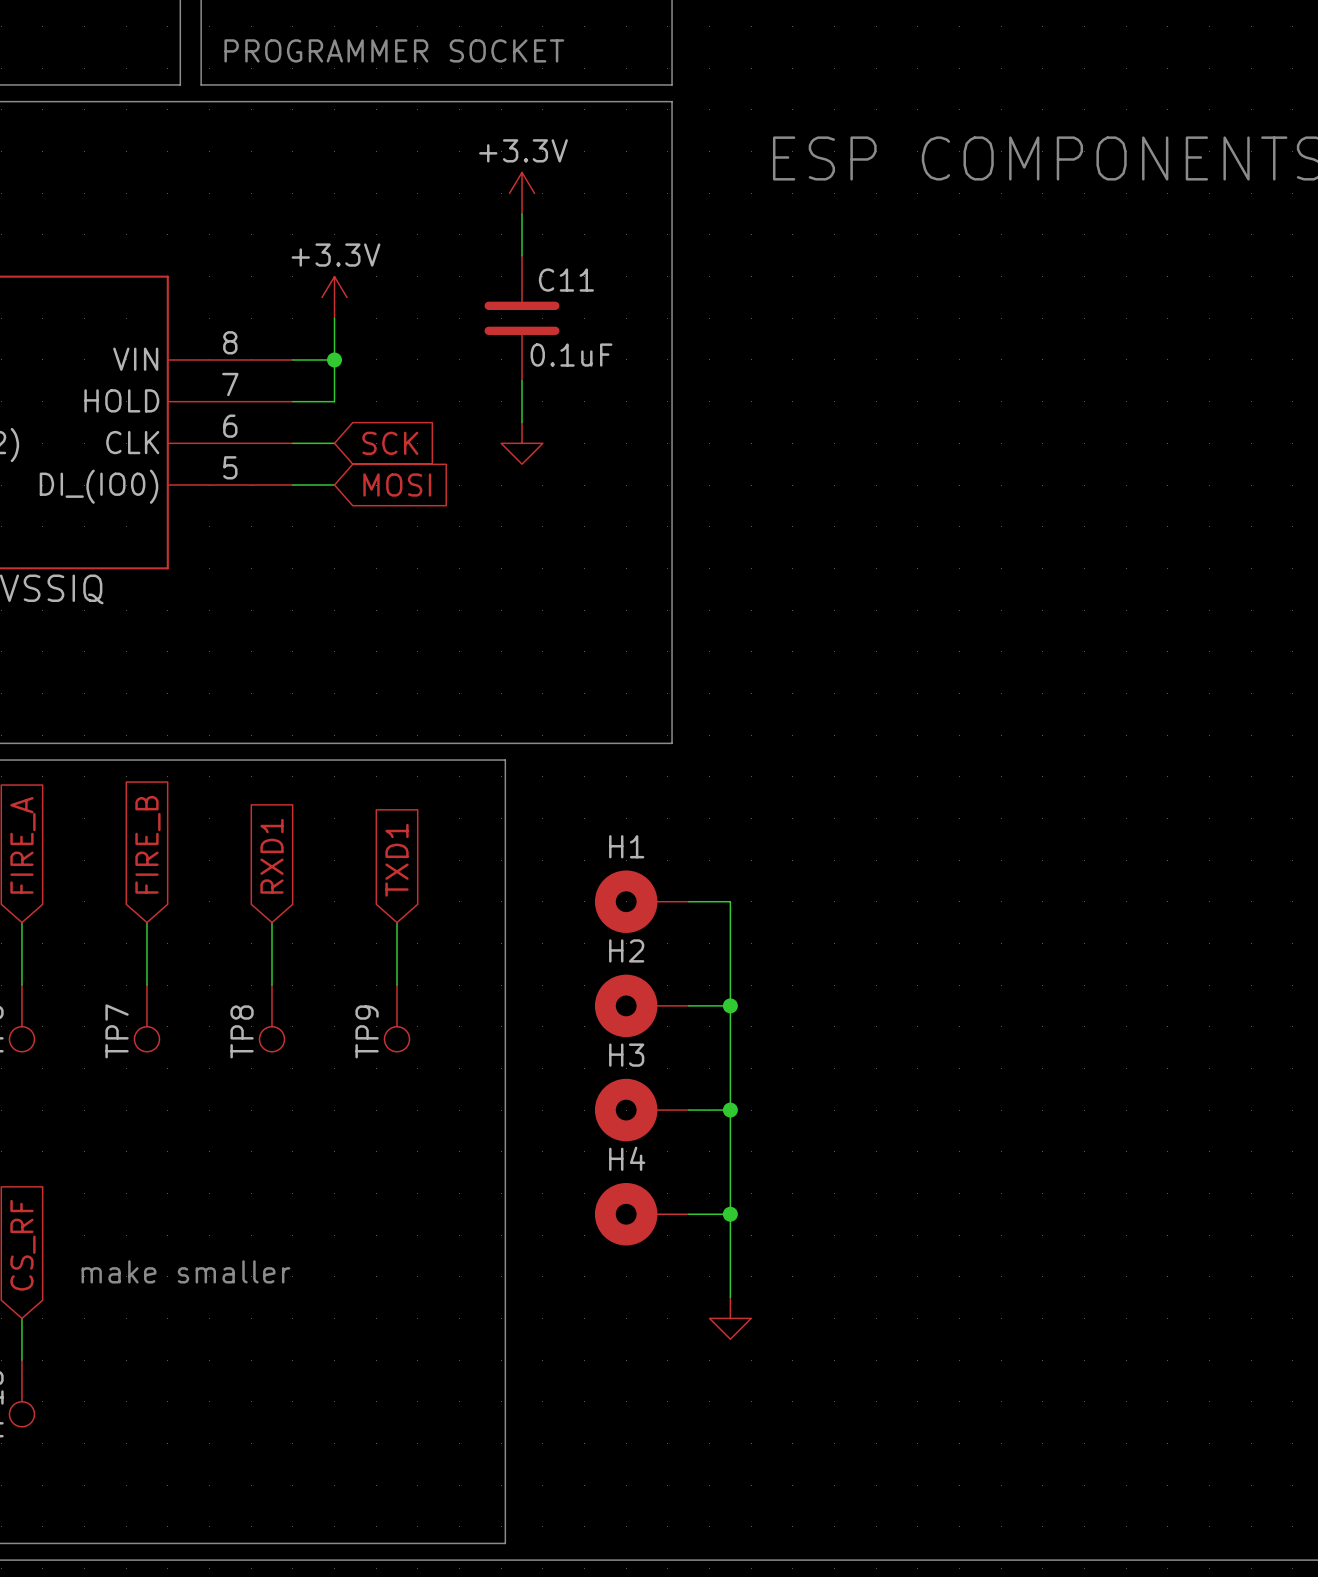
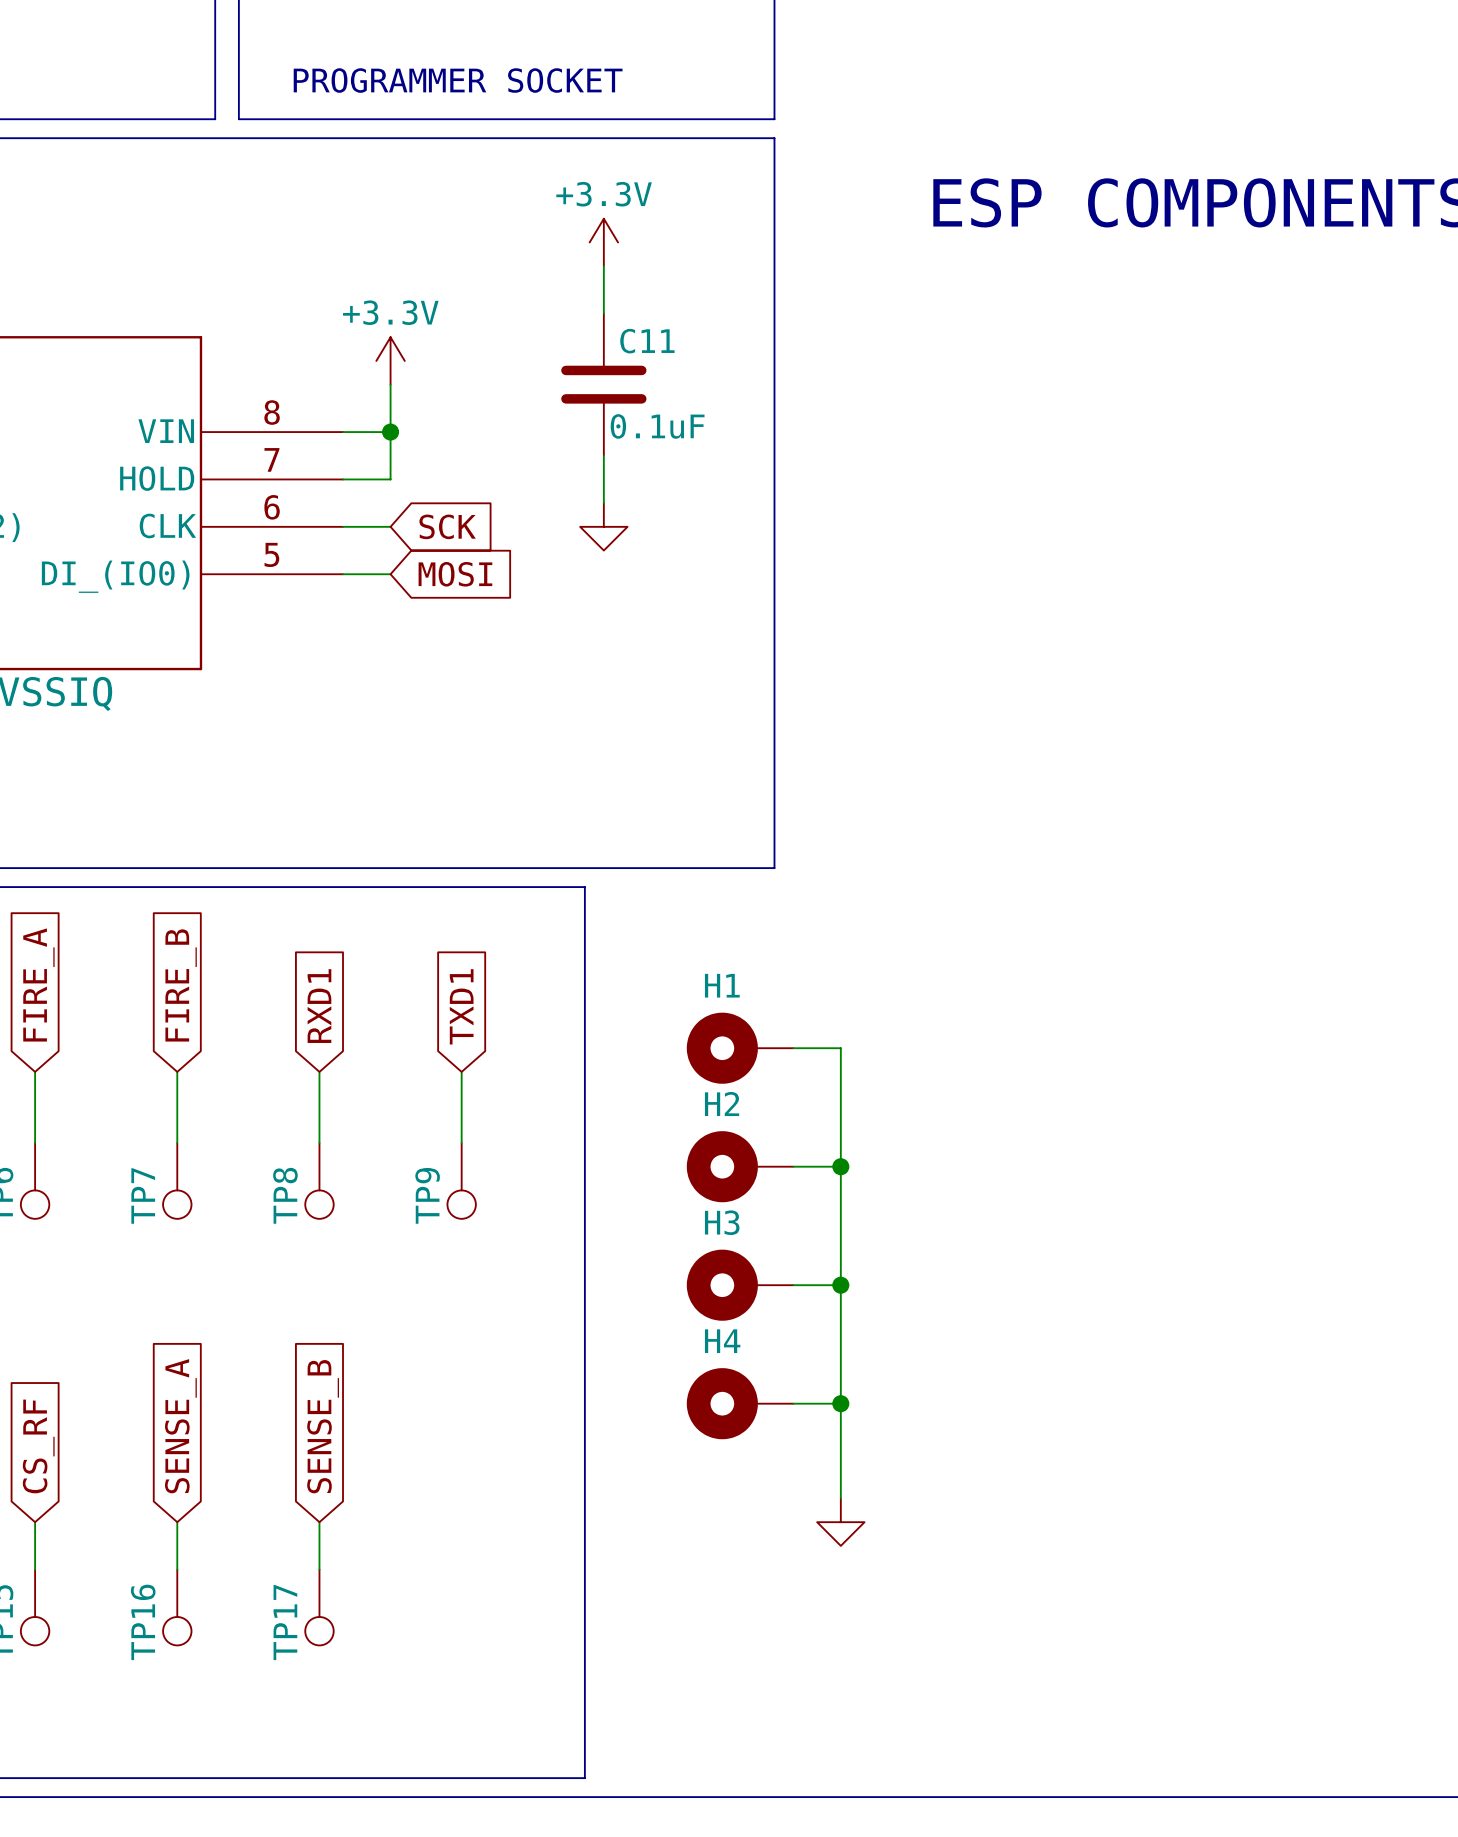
global label: none -> SENSE_A (180, 1426)
global label: none -> SENSE_B (323, 1426)
text: make smaller (185, 1271) -> none
wire: none -> (177, 1522) (177, 1569)
wire: none -> (319, 1522) (319, 1569)
TP16: none -> (177, 1607)
TP17: none -> (319, 1607)

